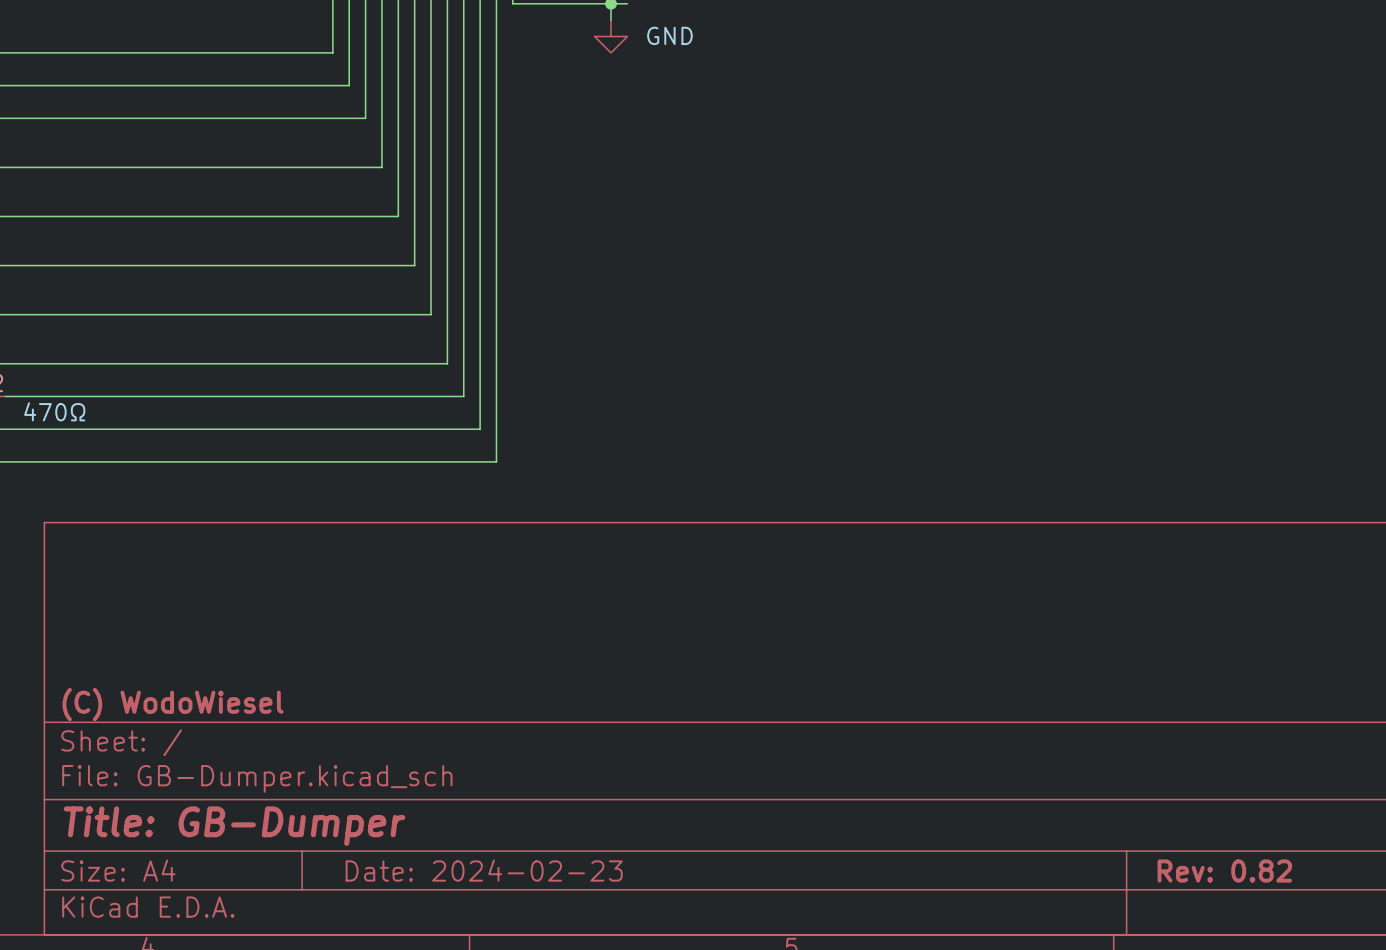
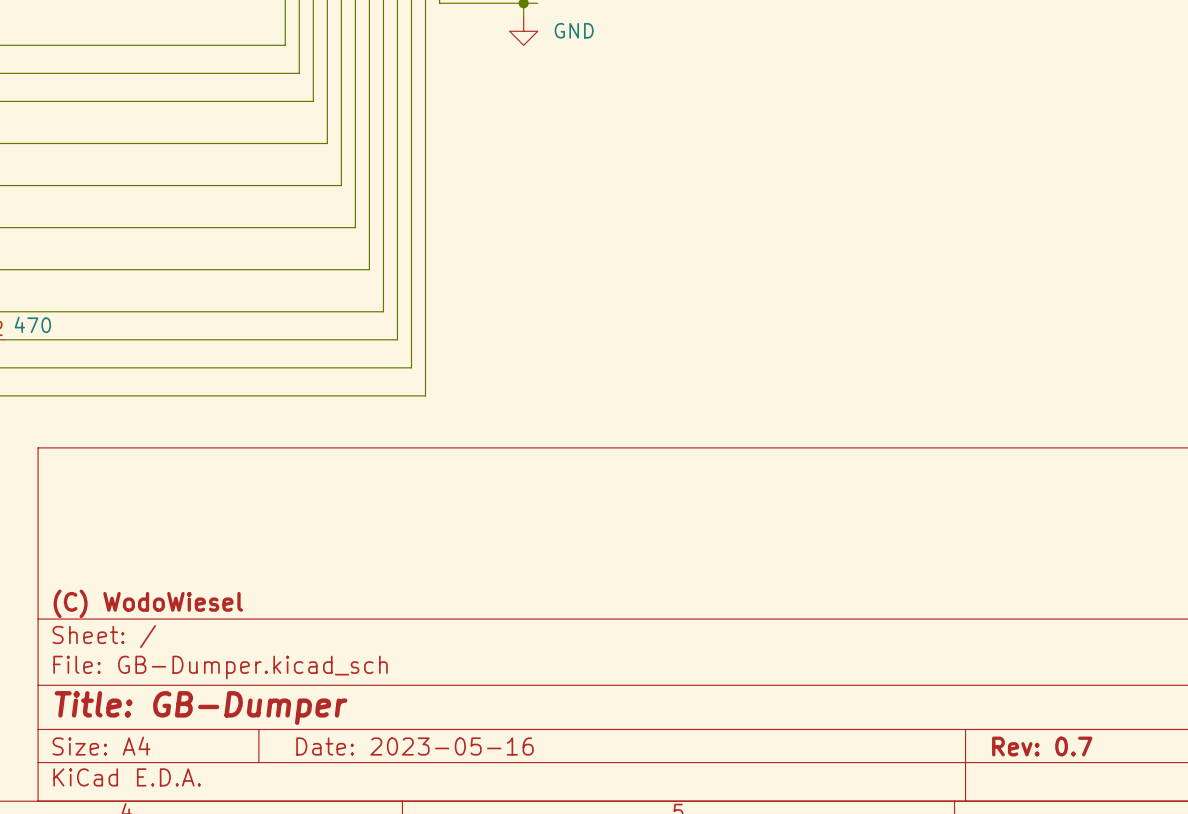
part value: 470Ω (54, 411) -> 470 (32, 324)
title block: Date: 2024-02-23 (484, 870) -> Date: 2023-05-16 (414, 746)
title block: Rev: 0.82 (1224, 871) -> Rev: 0.7 (1042, 746)

